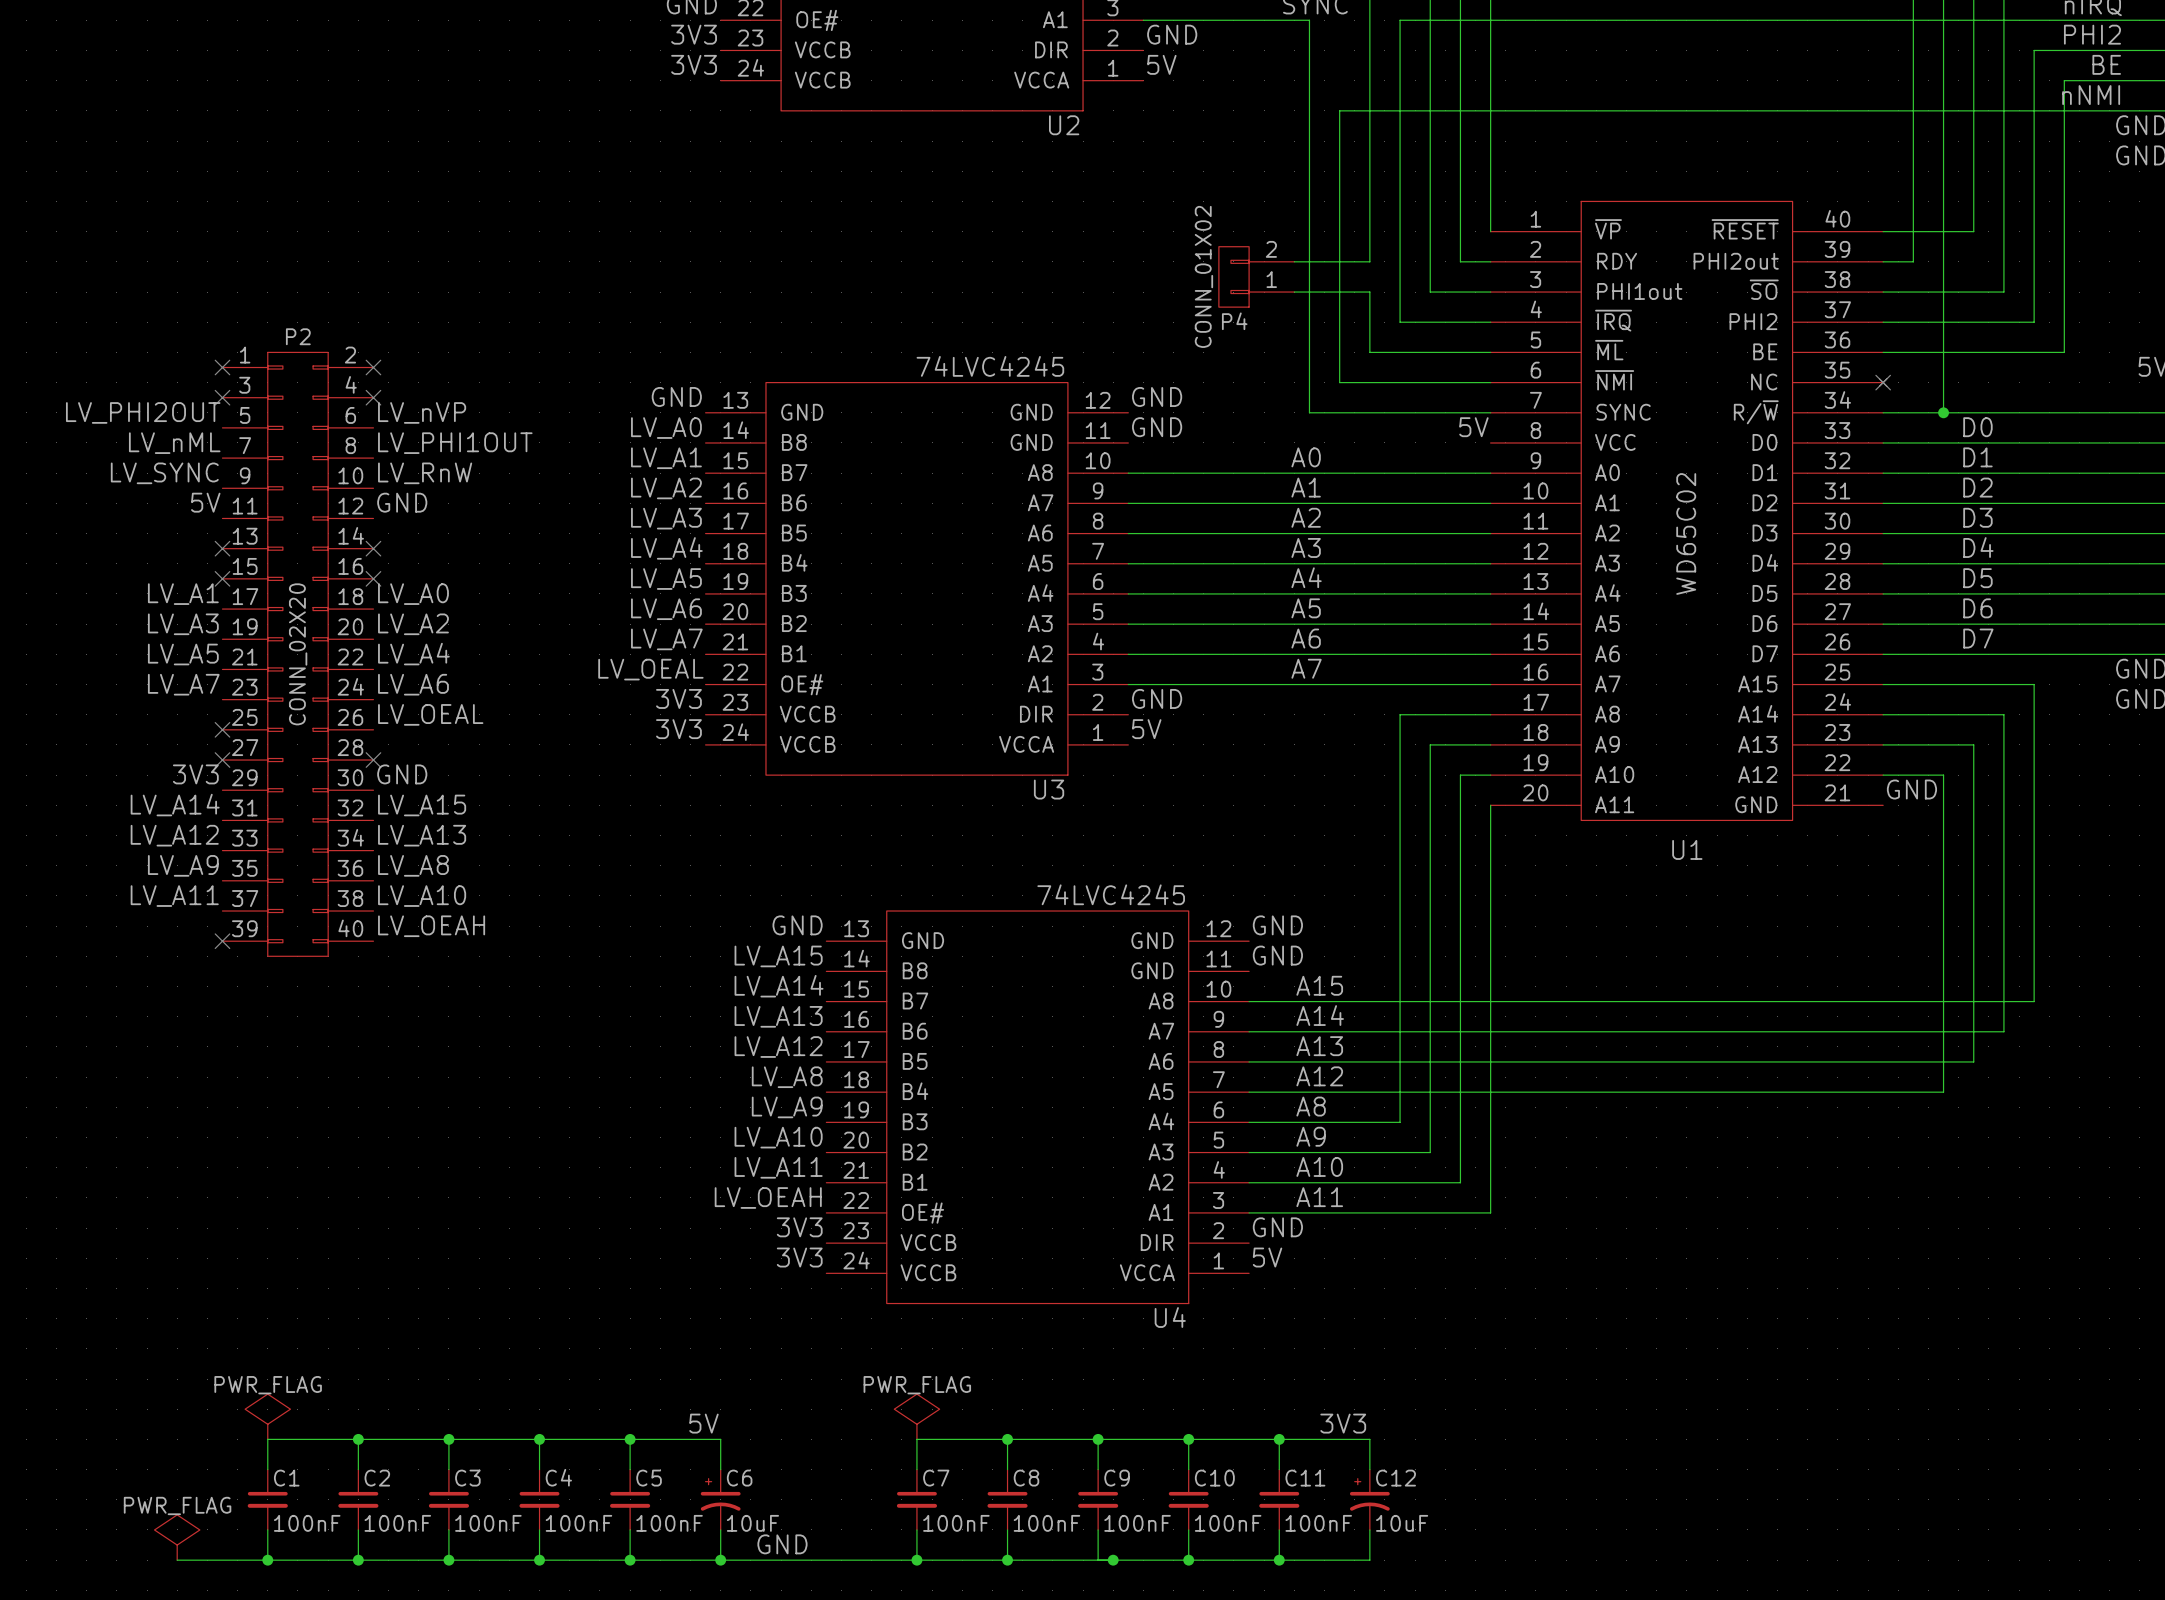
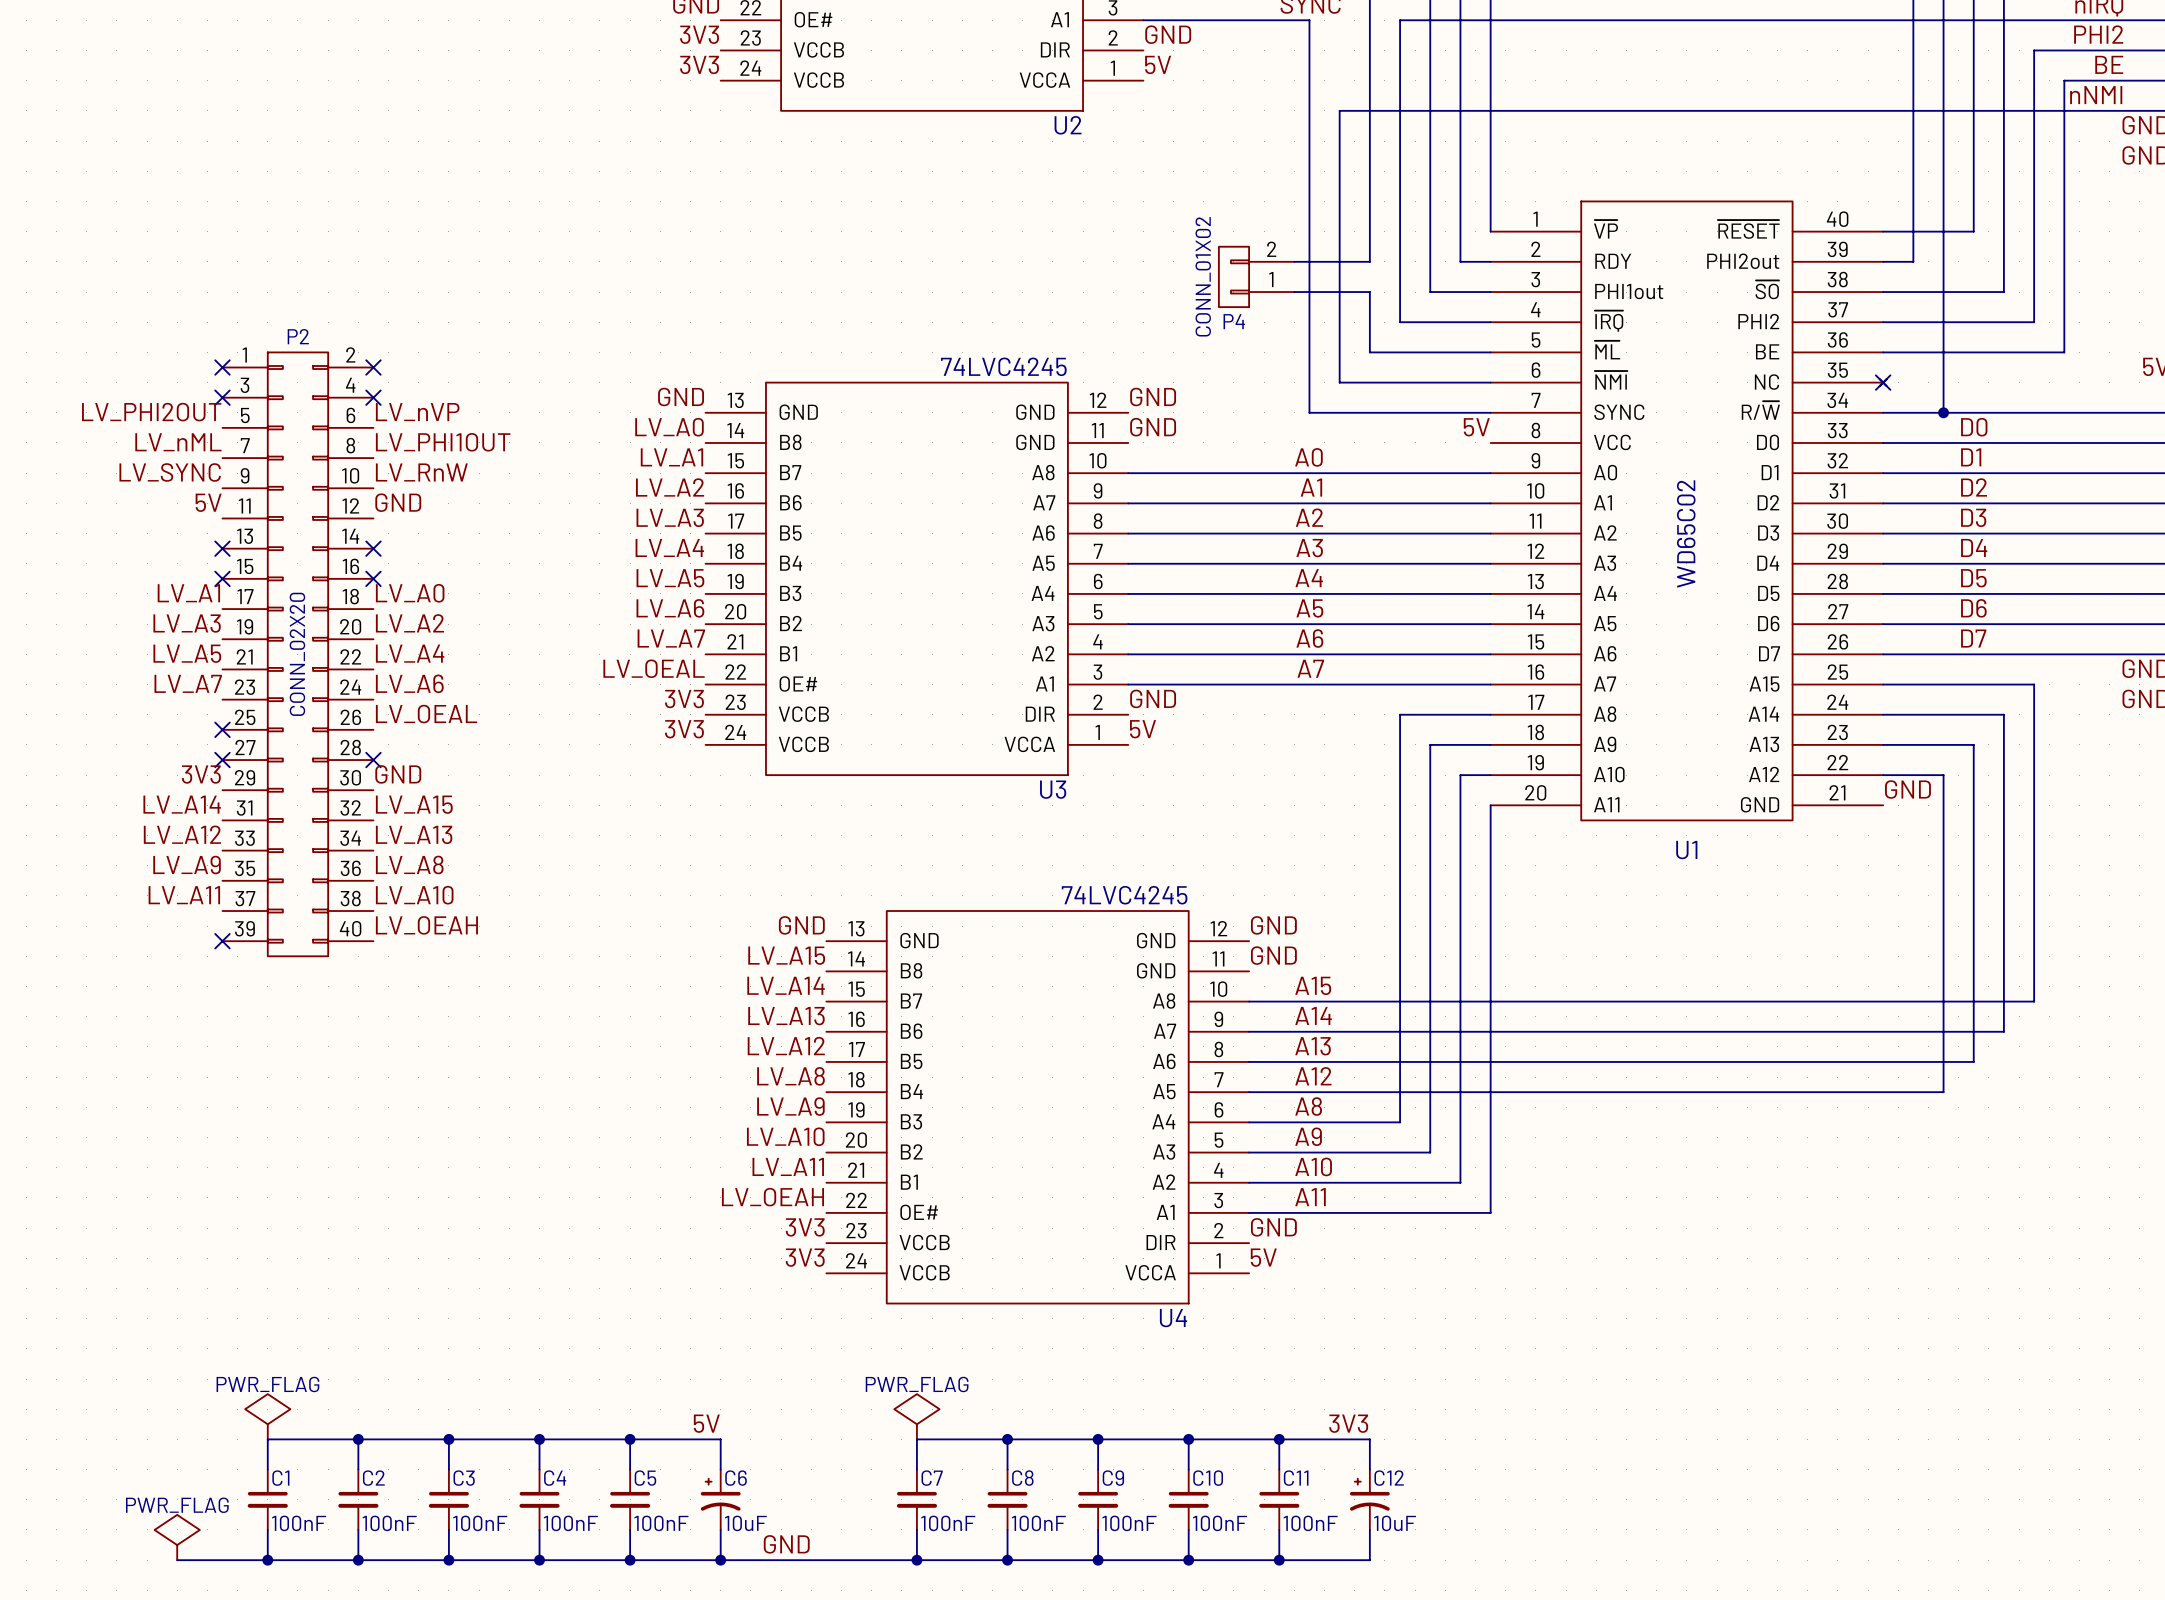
junction position: (1113, 1560) -> (1098, 1560)

